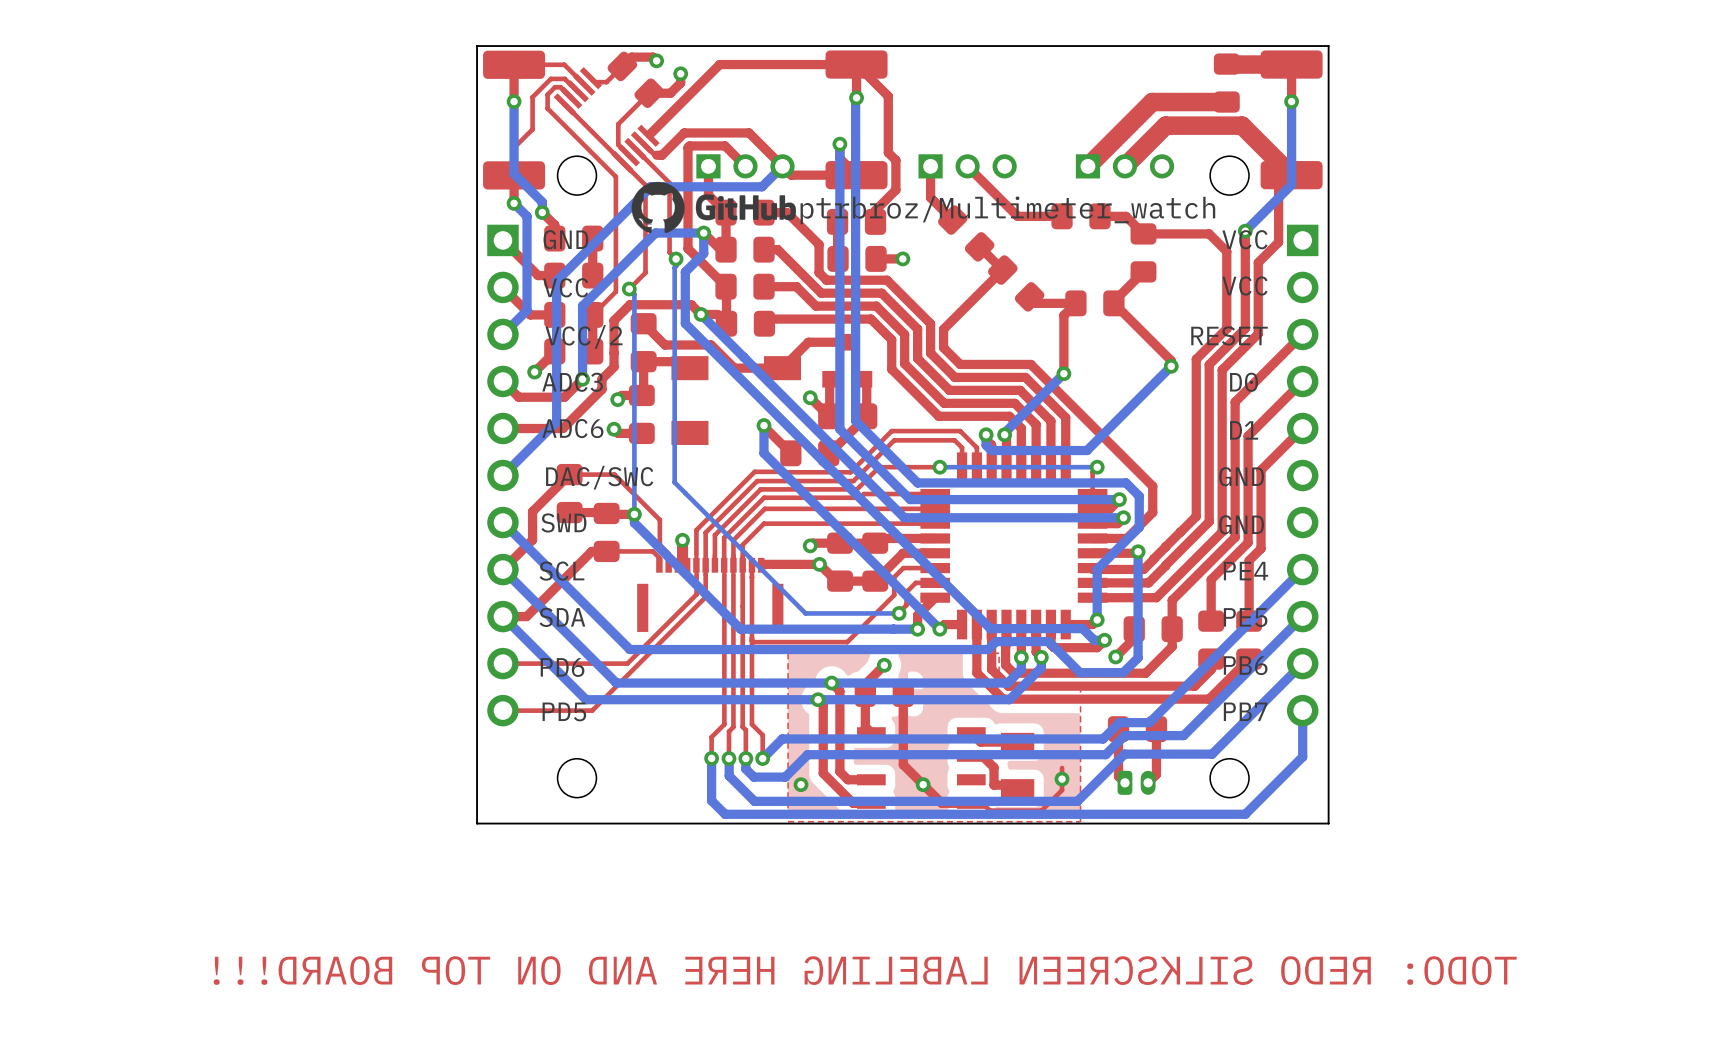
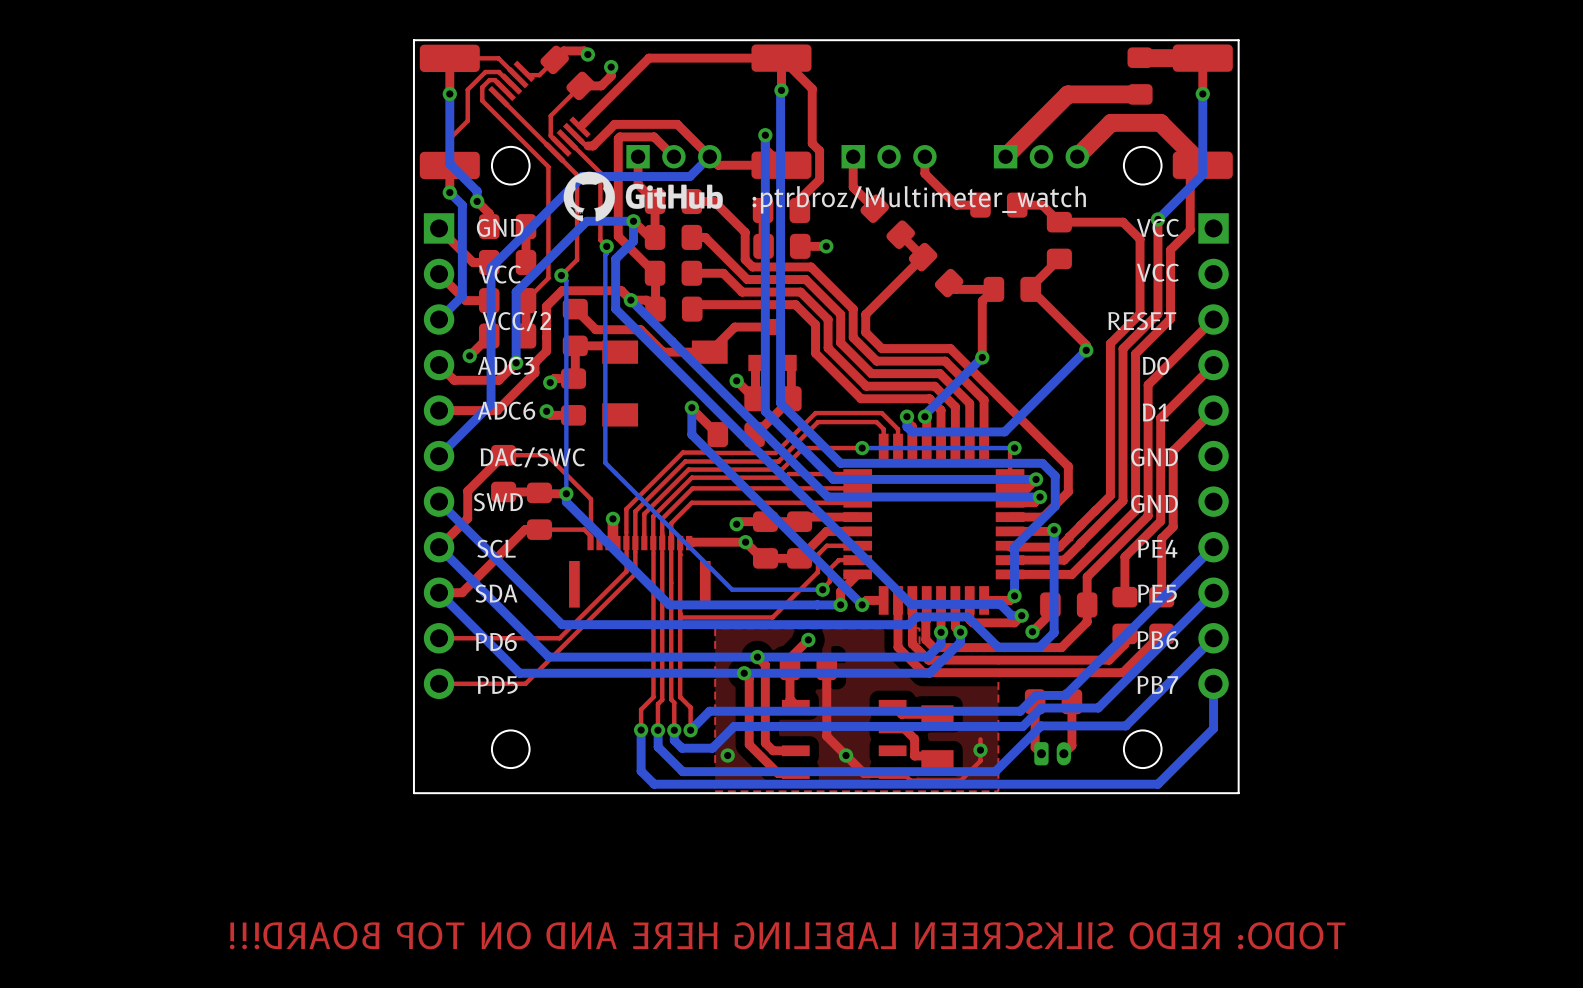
top track: (1247, 131) (1242, 125) (1165, 125) (1124, 166) -> (1160, 122) (1111, 122) (1077, 156)
top track: (967, 166) (1017, 216) (1037, 216) -> (924, 156) (924, 173) (956, 205)

